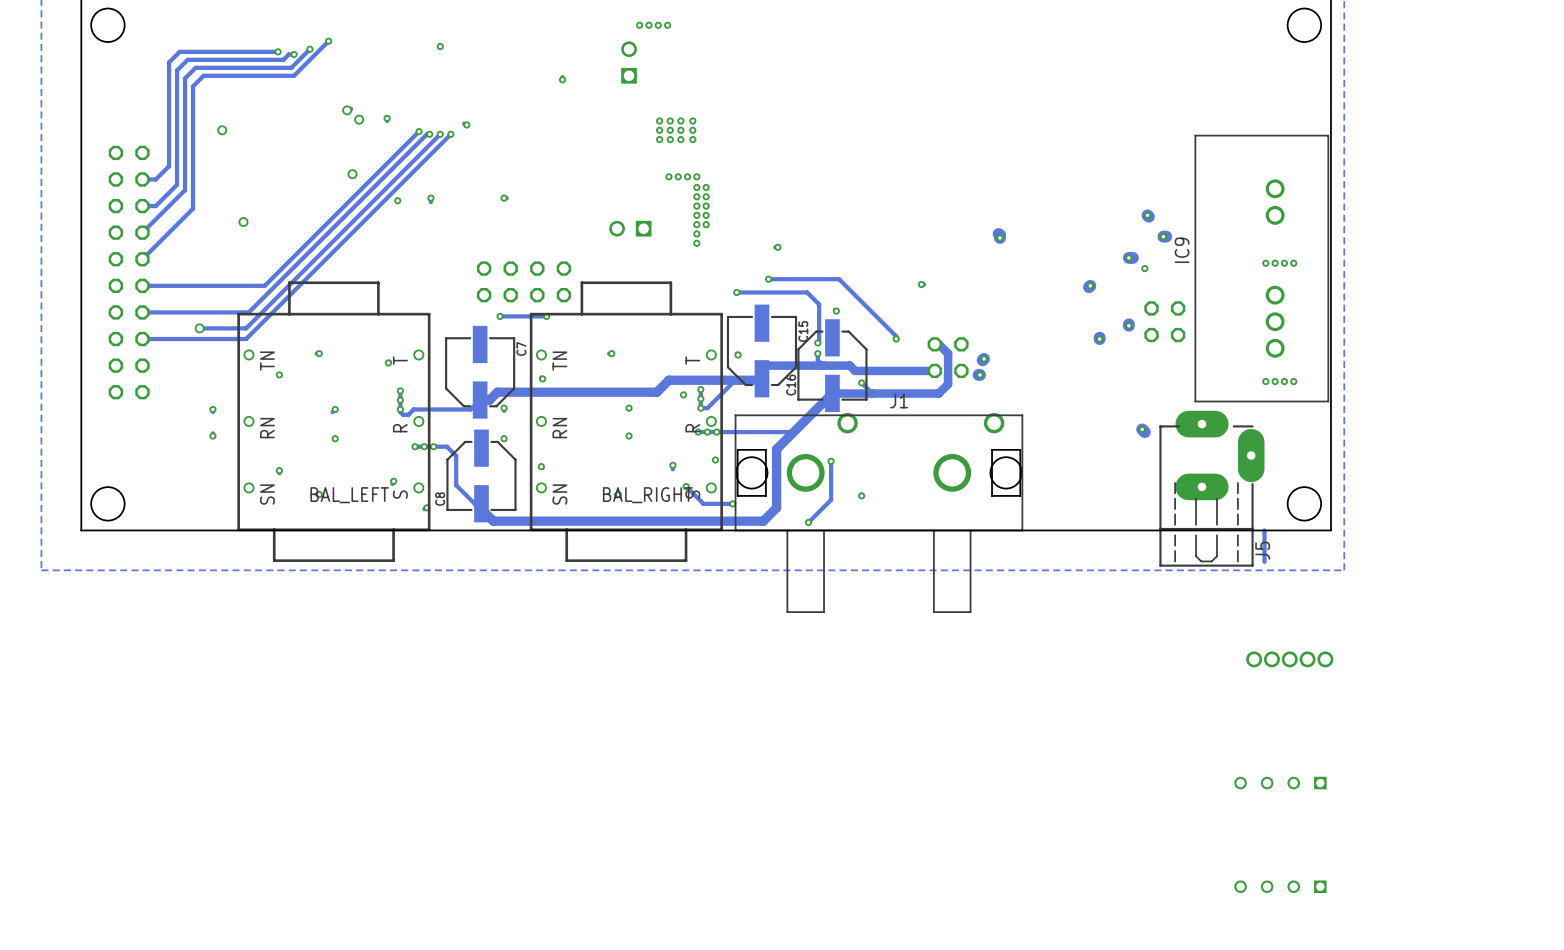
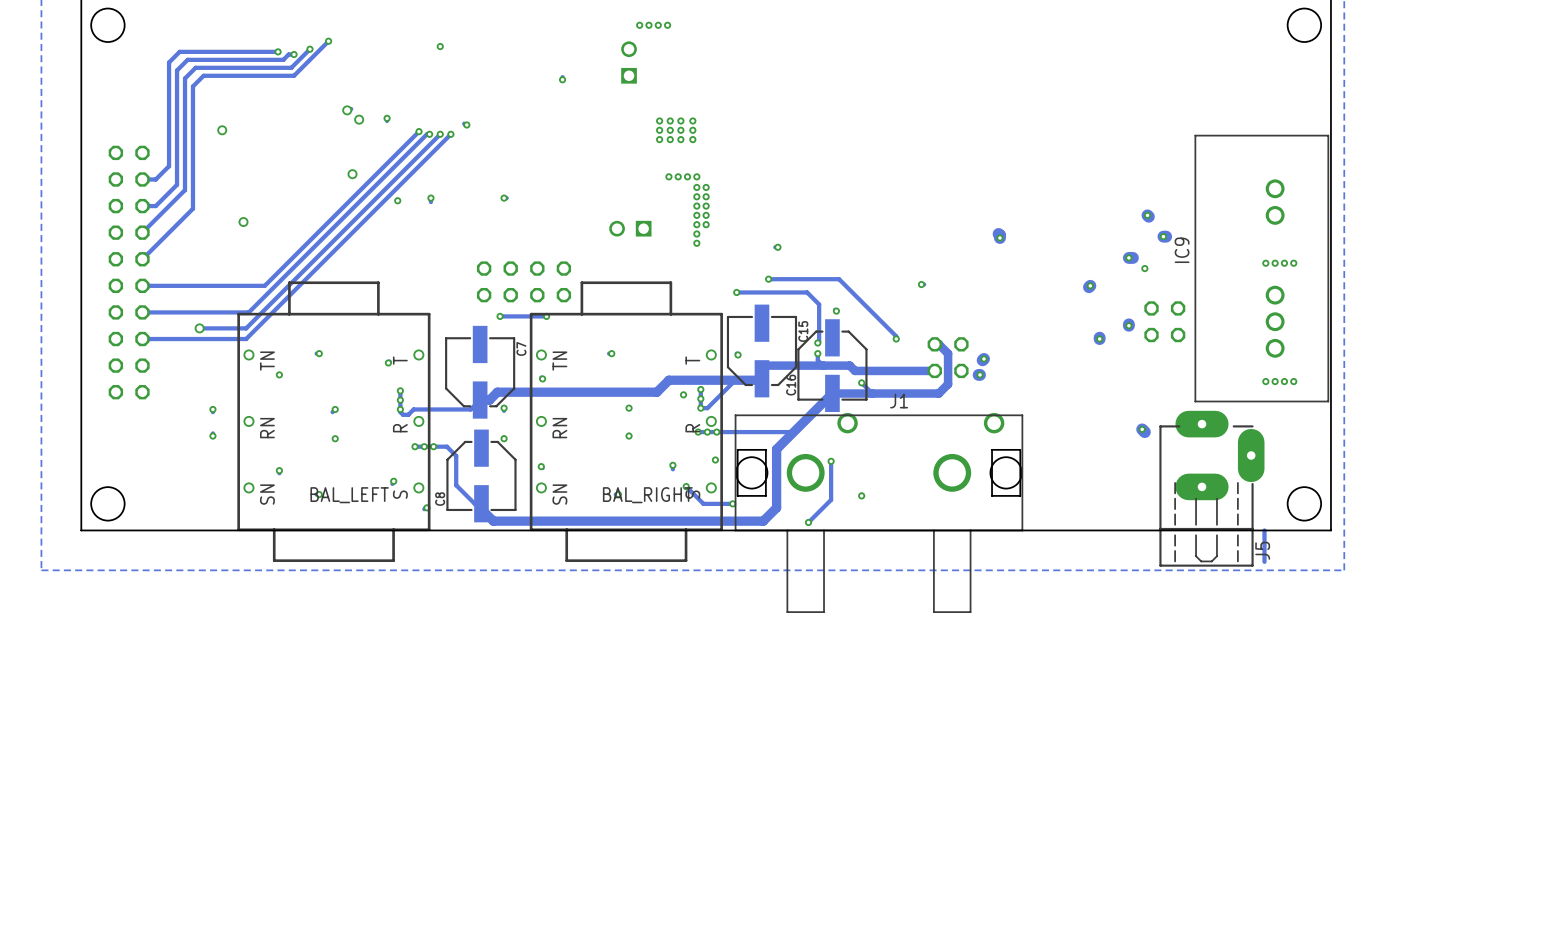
part: (1289, 659) -> none
part: (1280, 783) -> none
part: (1280, 886) -> none

